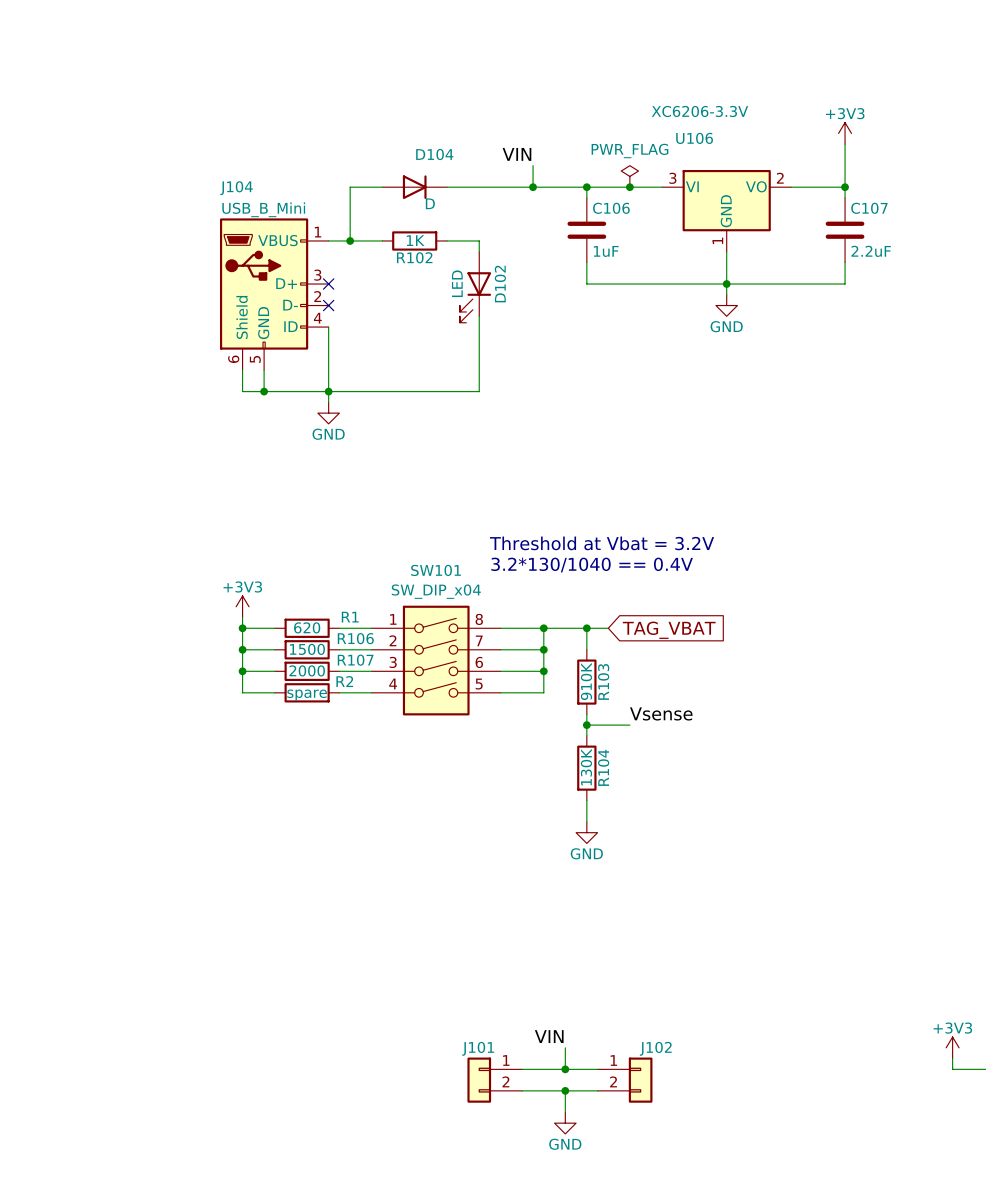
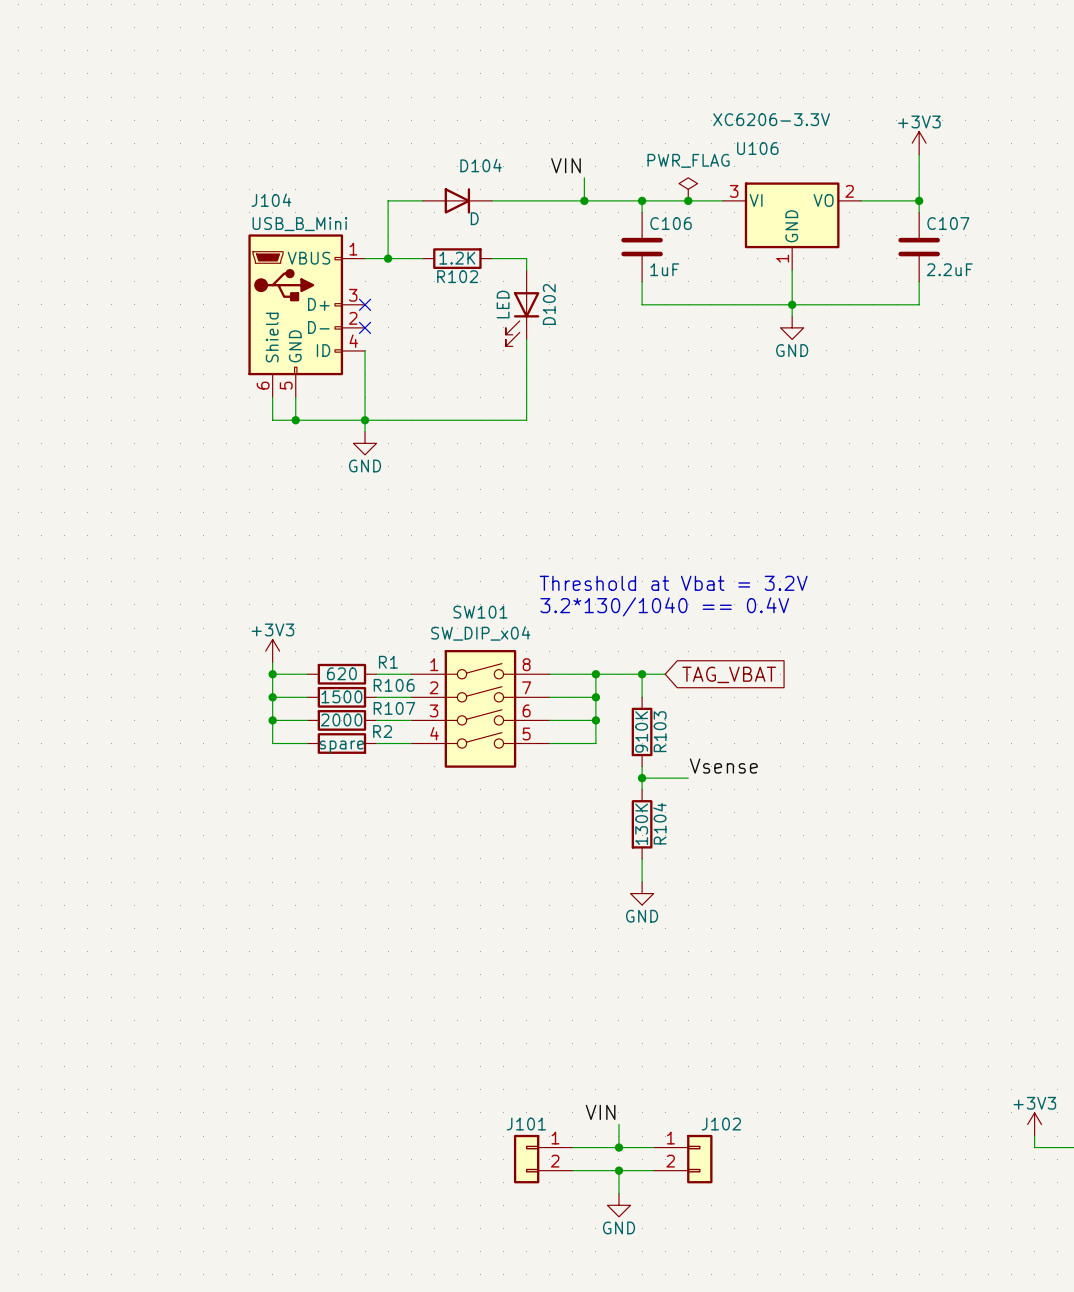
R102 value: 1K (415, 240) -> 1.2K (457, 258)

